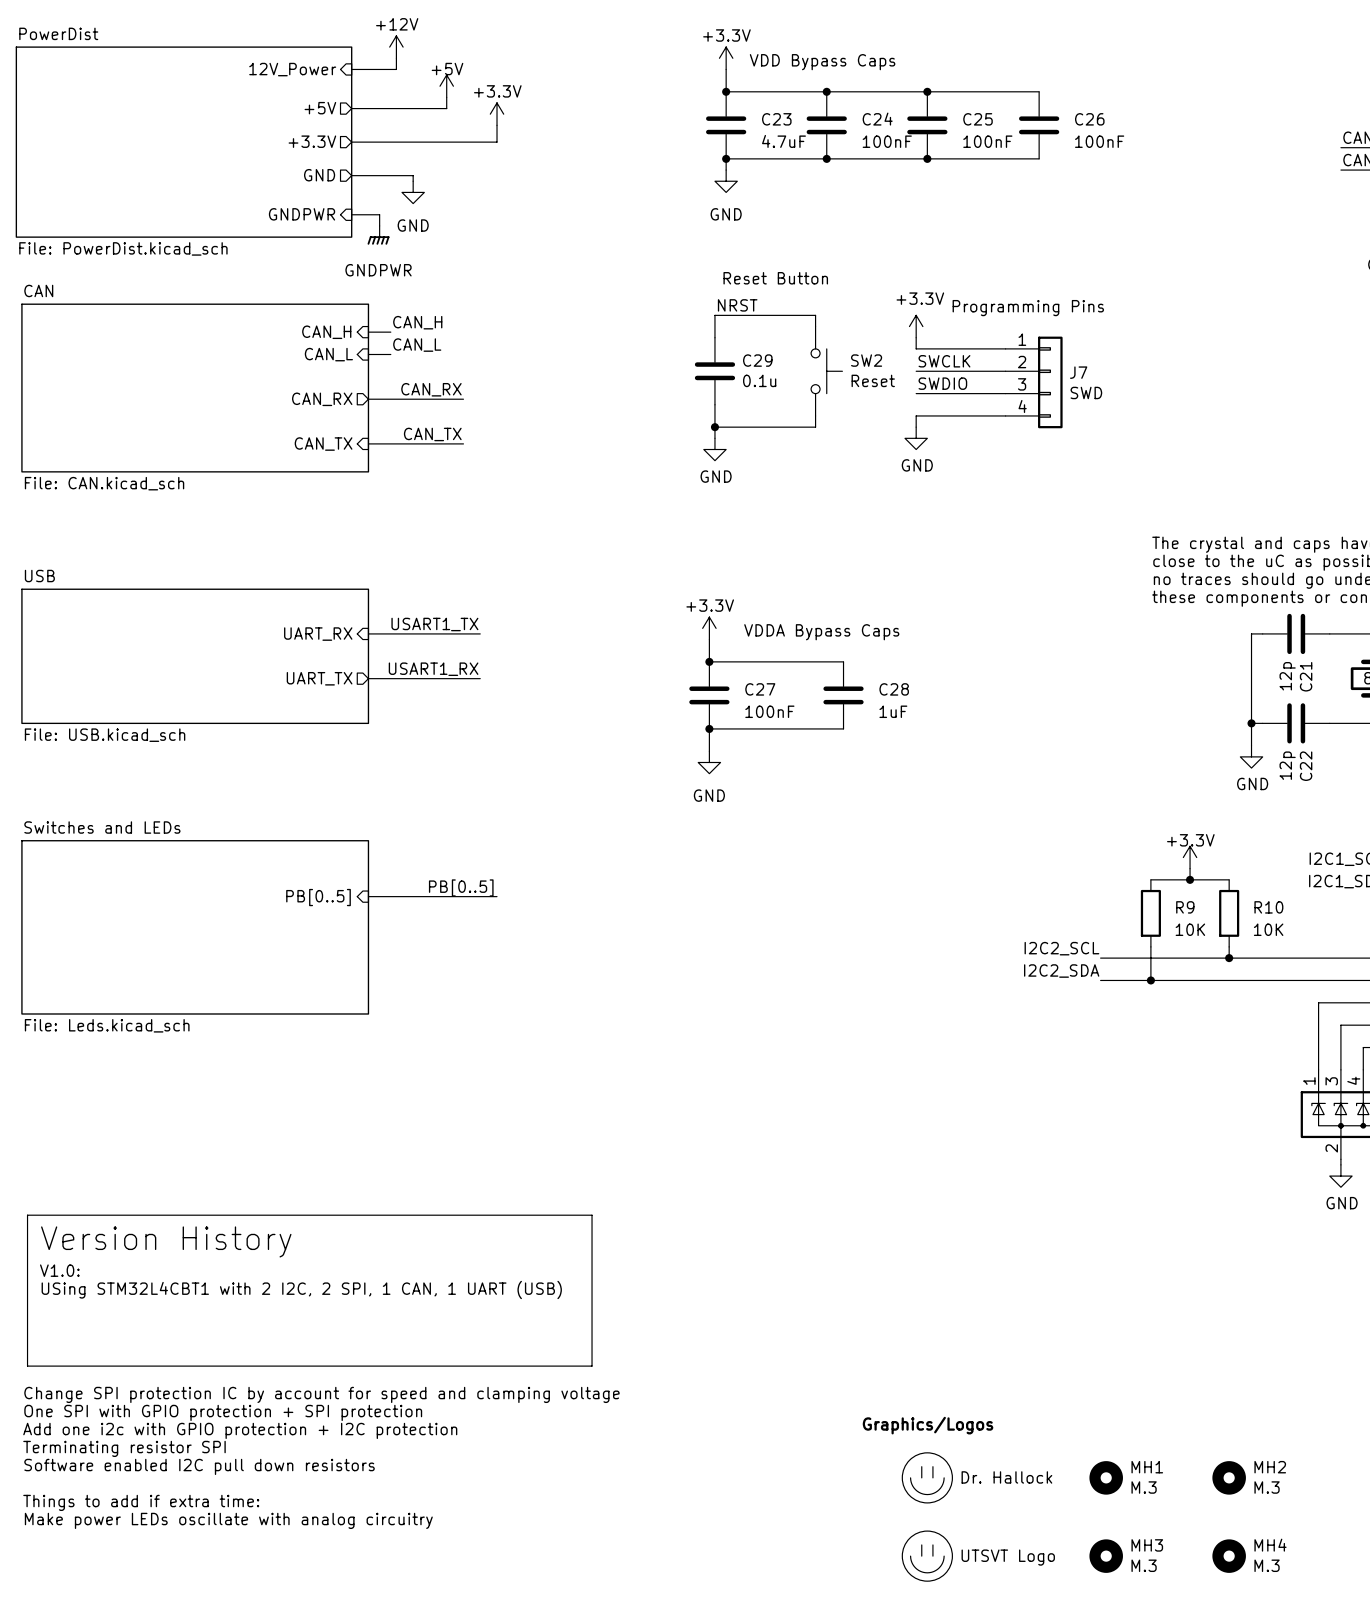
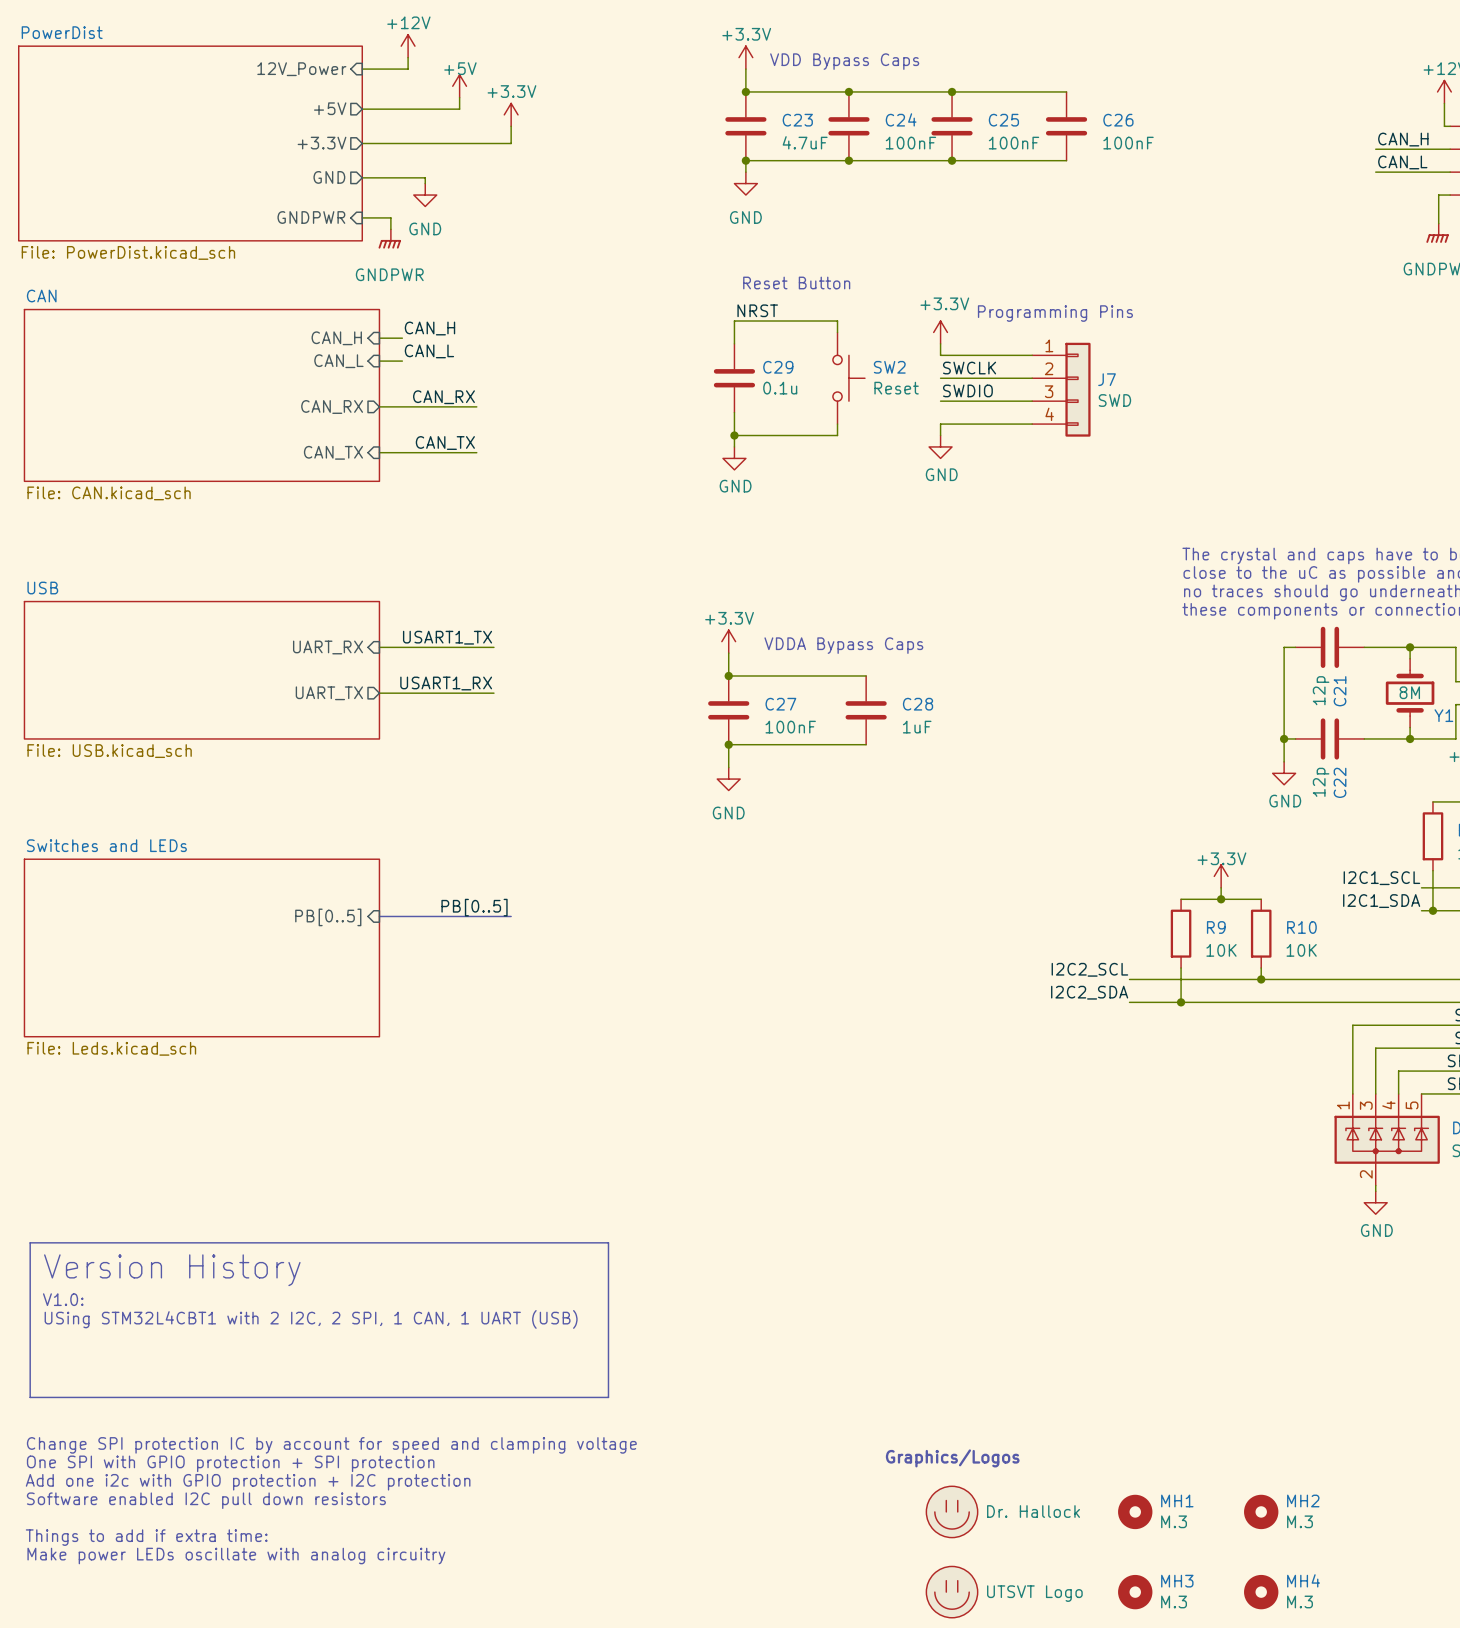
text: Change SPI protection IC by account for speed and clamping voltage (321, 1394) -> none
text: One SPI with GPIO protection + SPI protection (223, 1412) -> Change SPI protection IC by account for speed and clamping voltage (331, 1445)
text: Add one i2c with GPIO protection + I2C protection (240, 1430) -> One SPI with GPIO protection + SPI protection (230, 1463)
text: Terminating resistor SPI (124, 1448) -> Add one i2c with GPIO protection + I2C protection (248, 1482)

